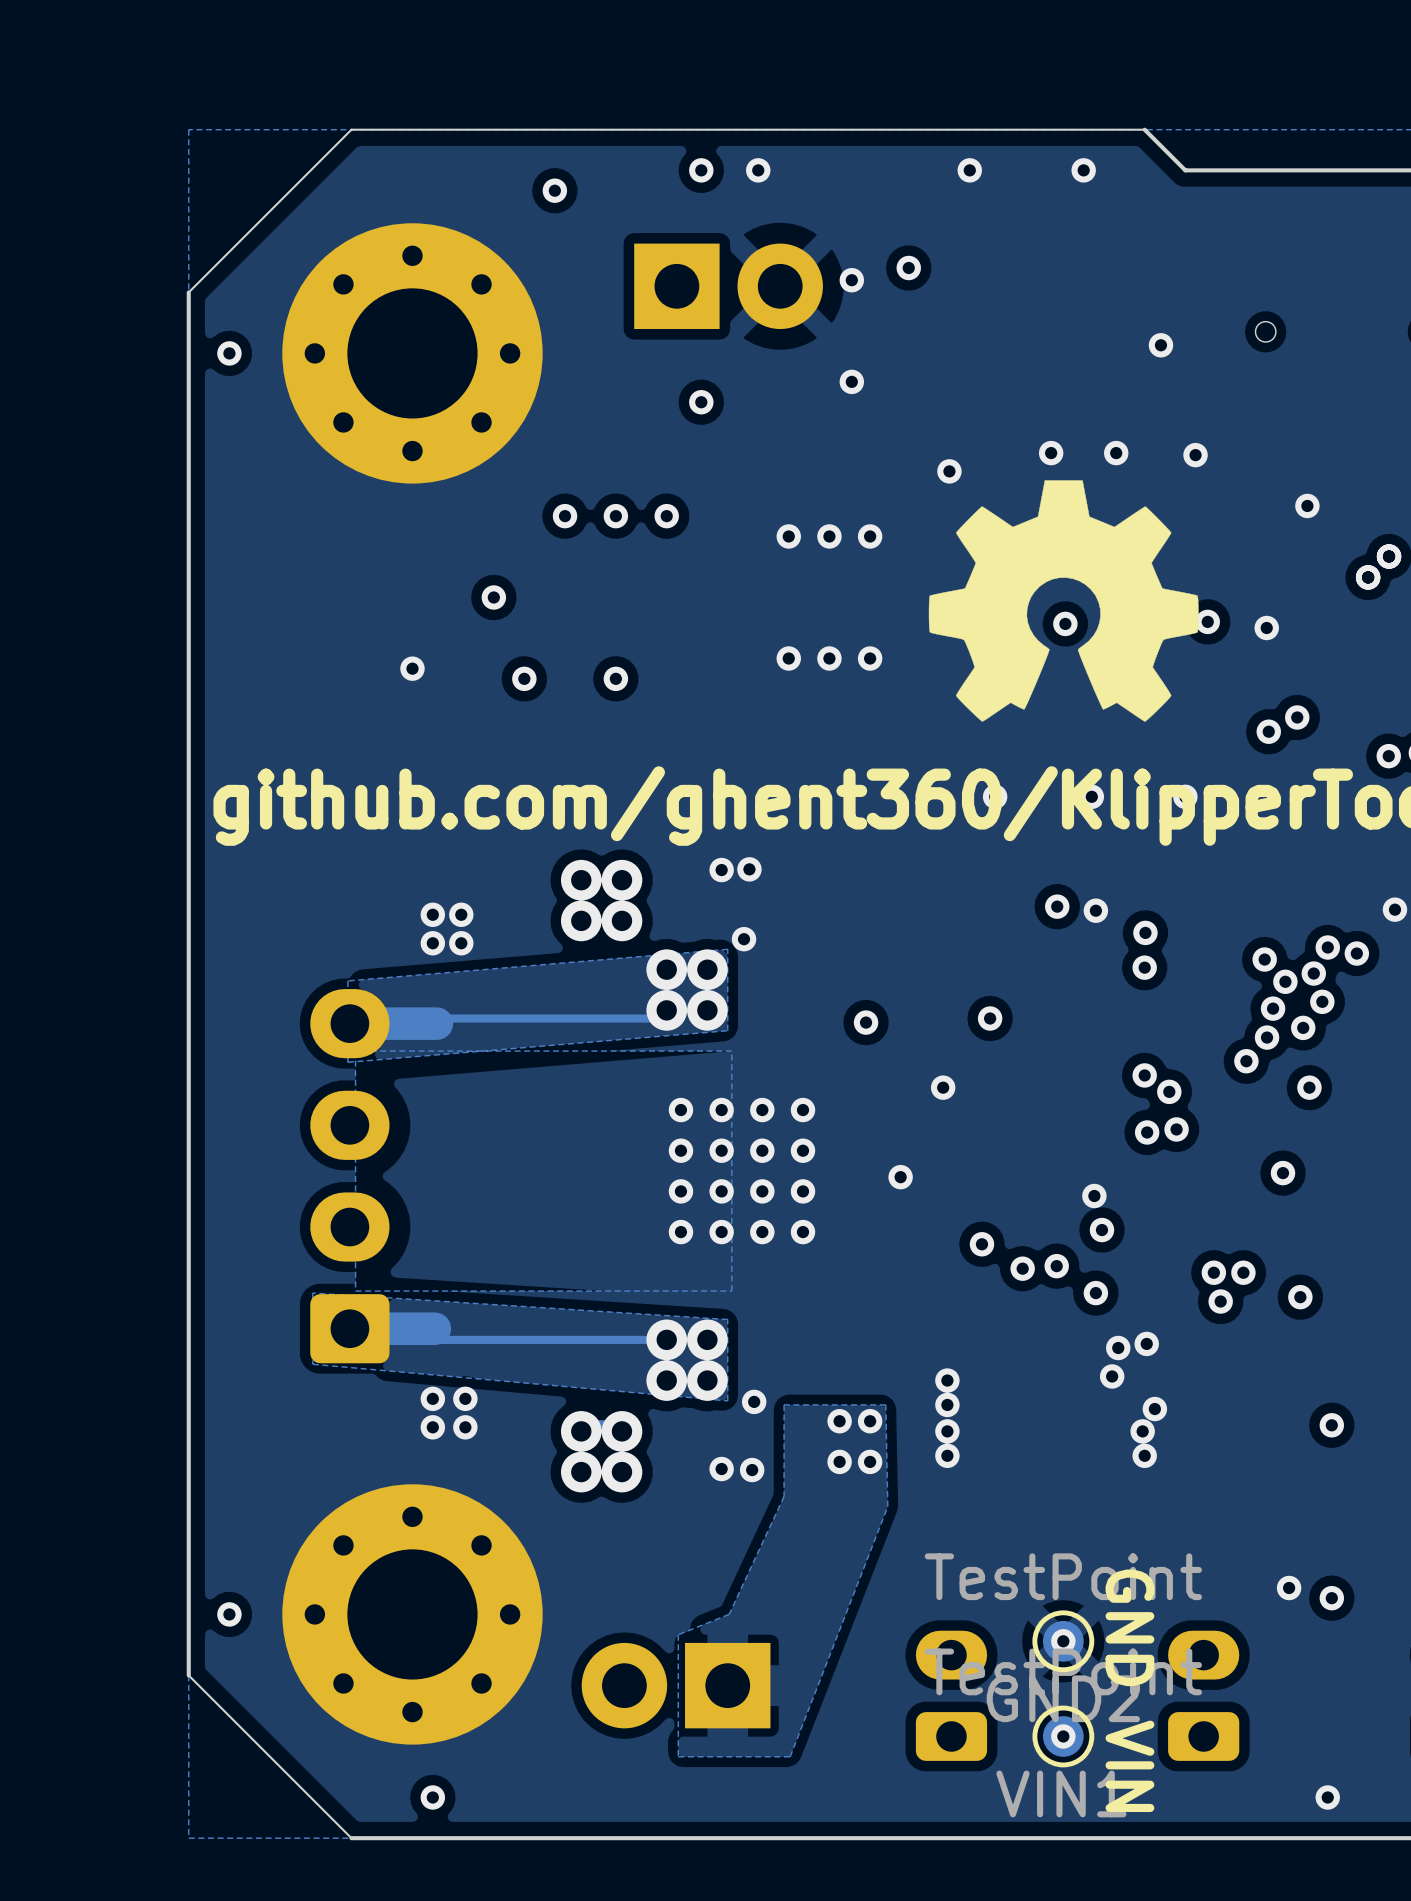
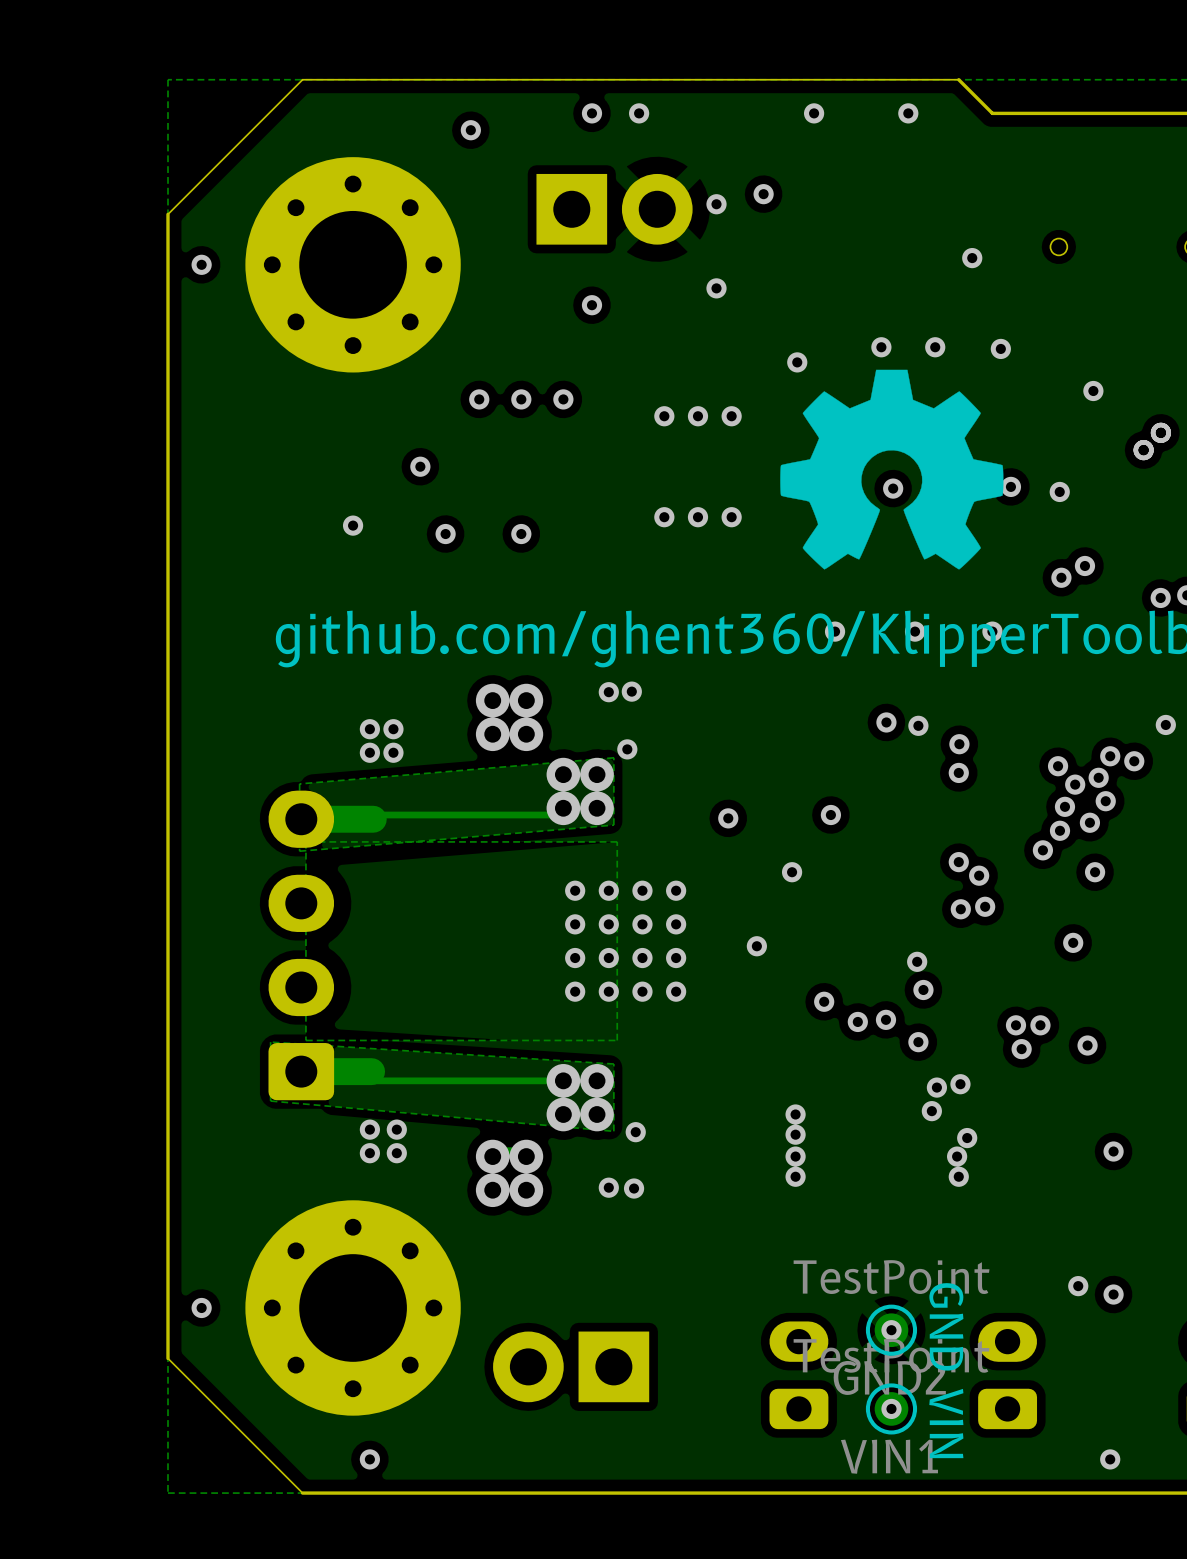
zone outline: (885, 1404) (887, 1506) (790, 1756) (678, 1756) (678, 1634) (729, 1614) (784, 1496) (784, 1404) (885, 1404) -> none
via: (839, 1421) -> none
via: (870, 1421) -> none
via: (839, 1461) -> none
via: (870, 1461) -> none

